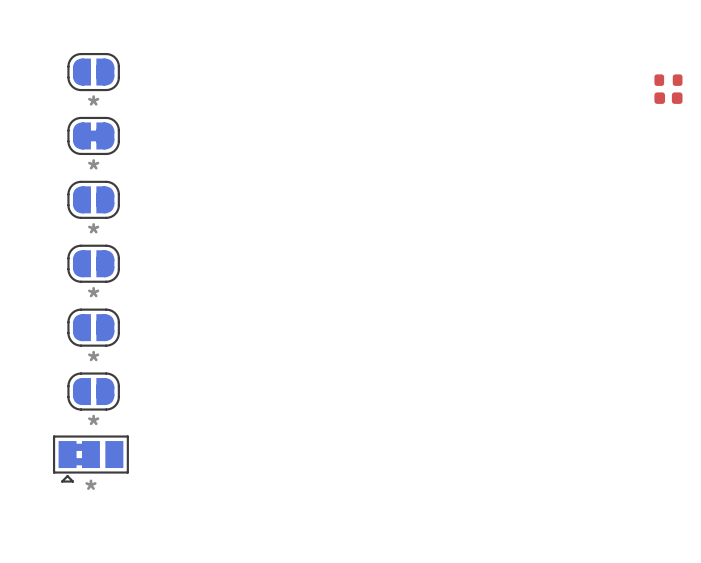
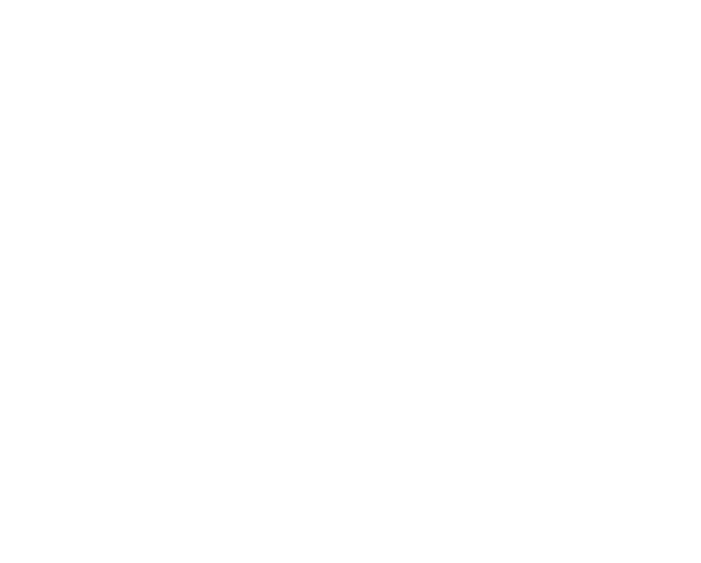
part: * (93, 72) -> none
part: (668, 80) -> none
part: (668, 98) -> none
part: * (93, 135) -> none
part: * (93, 199) -> none
part: * (93, 263) -> none
part: * (93, 327) -> none
part: * (93, 391) -> none
part: * (90, 459) -> none

